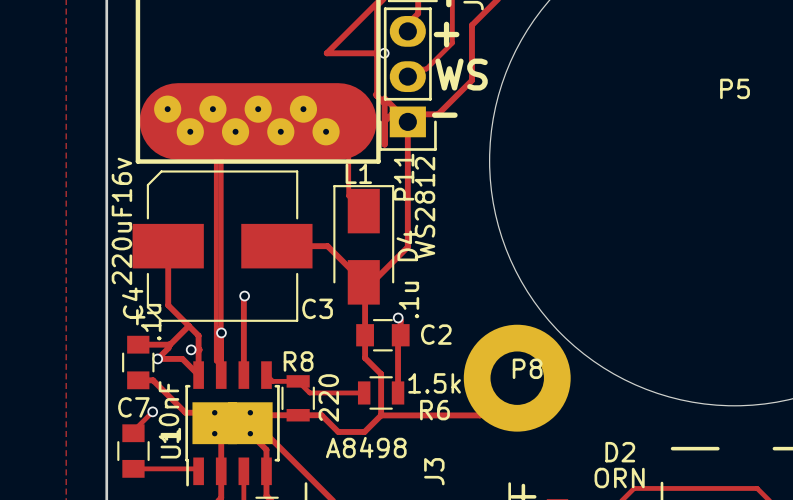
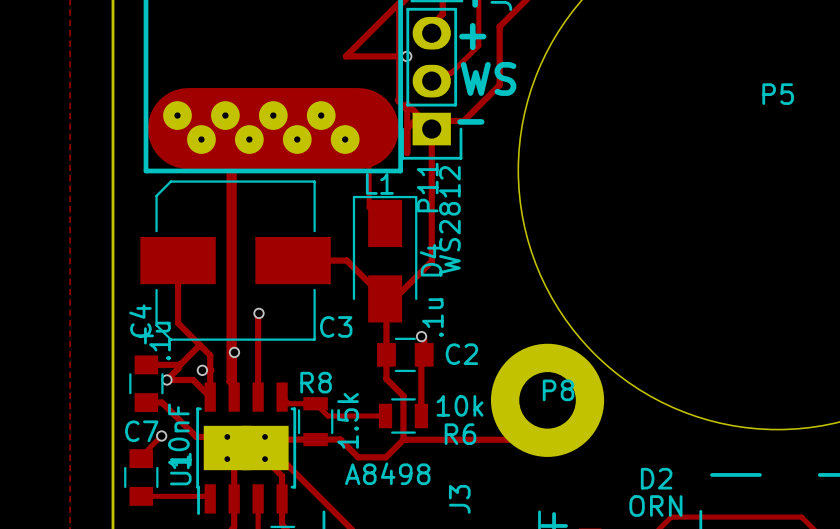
C3 value: 220uF16v (121, 221) -> none
R6 value: 1.5k (434, 383) -> 10k (460, 405)
R8 value: 220 (328, 398) -> 1.5k (348, 420)

